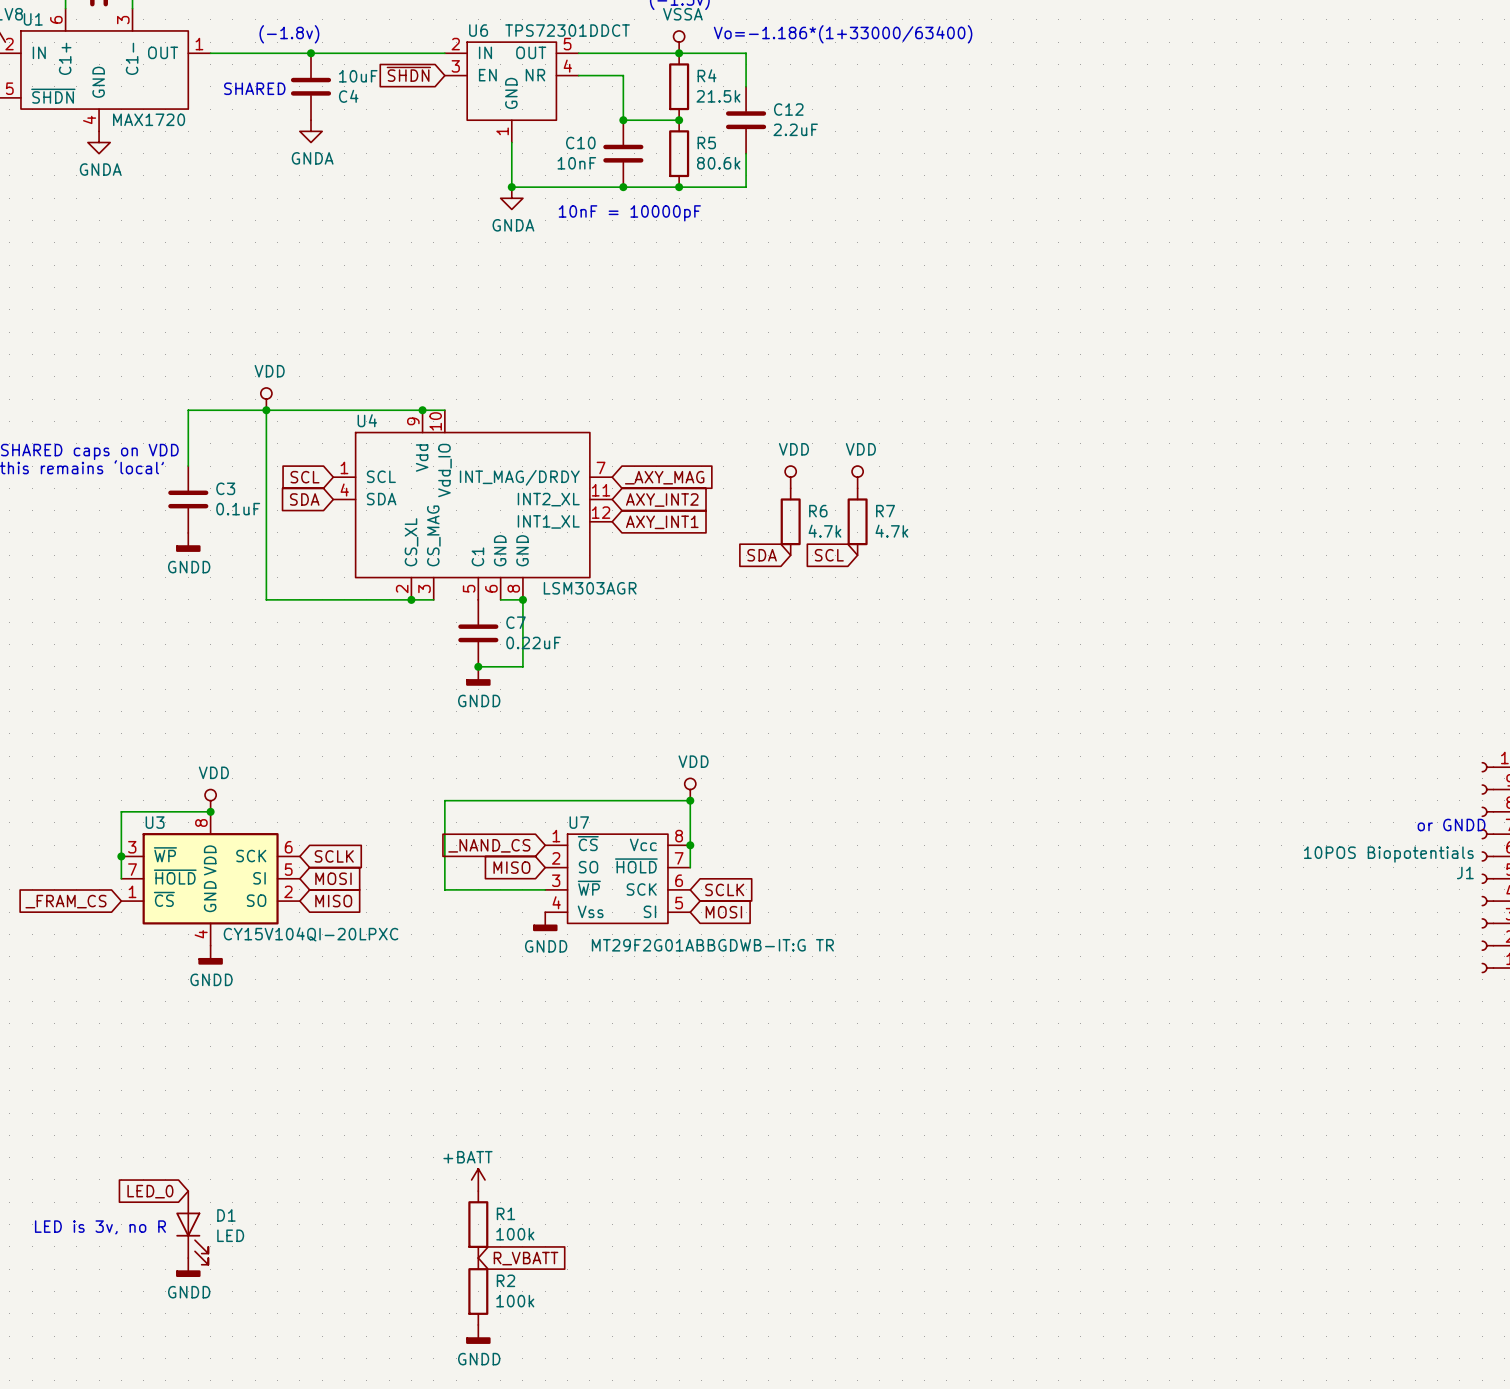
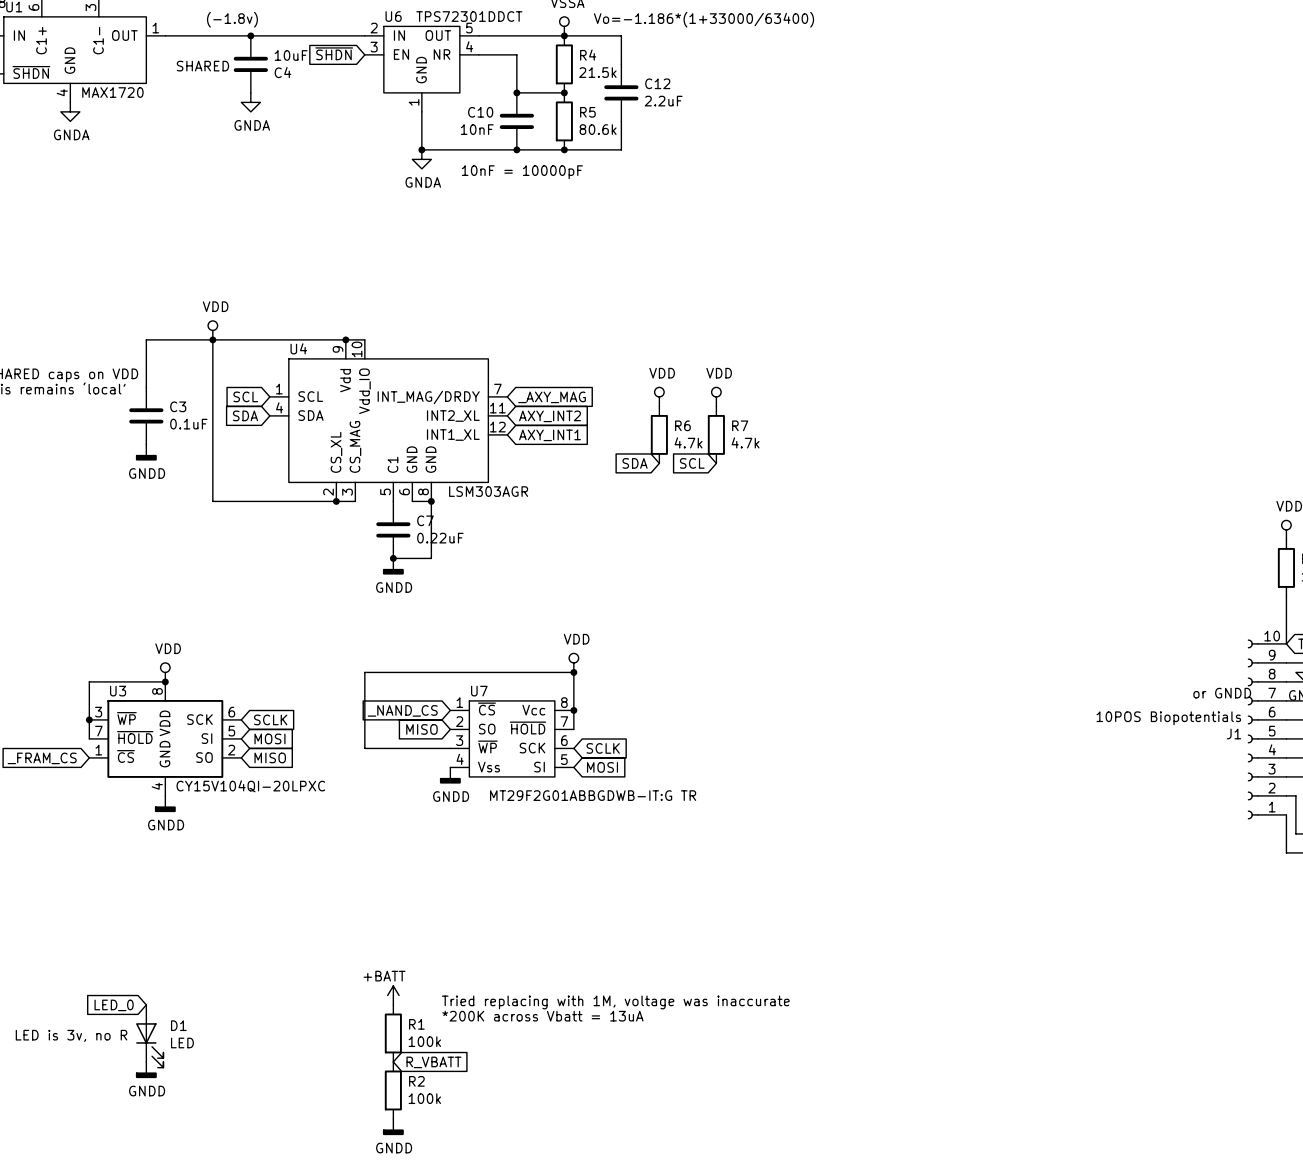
text: none -> Tried replacing with 1M, voltage was inaccurate (615, 1002)
text: none -> *200K across Vbatt = 13uA (542, 1016)

